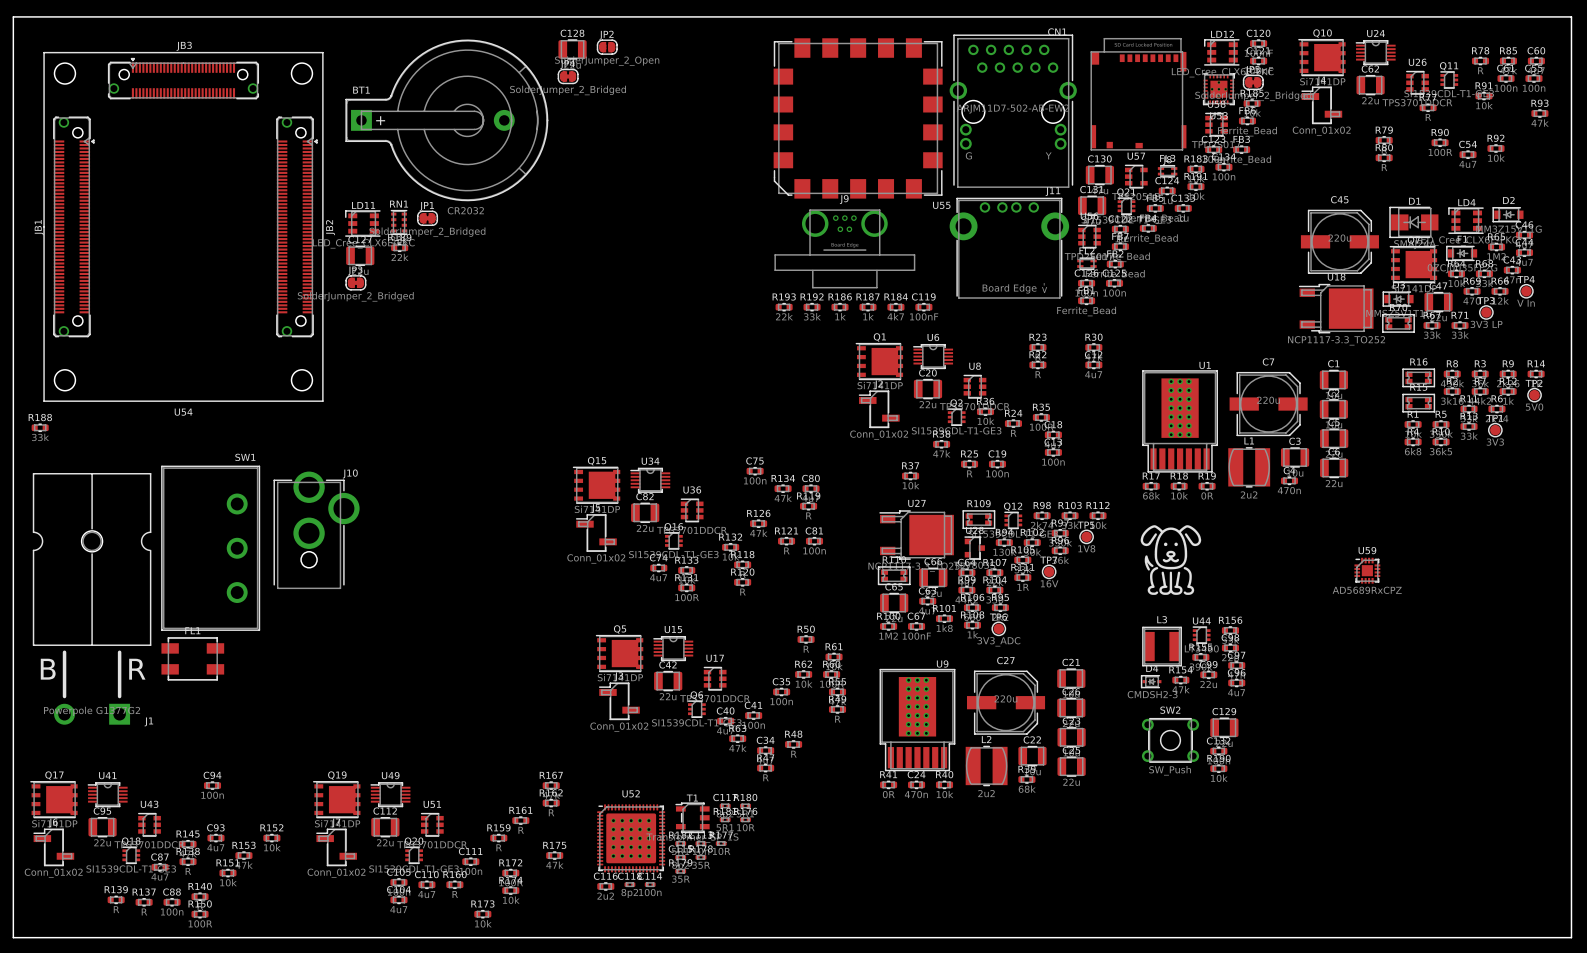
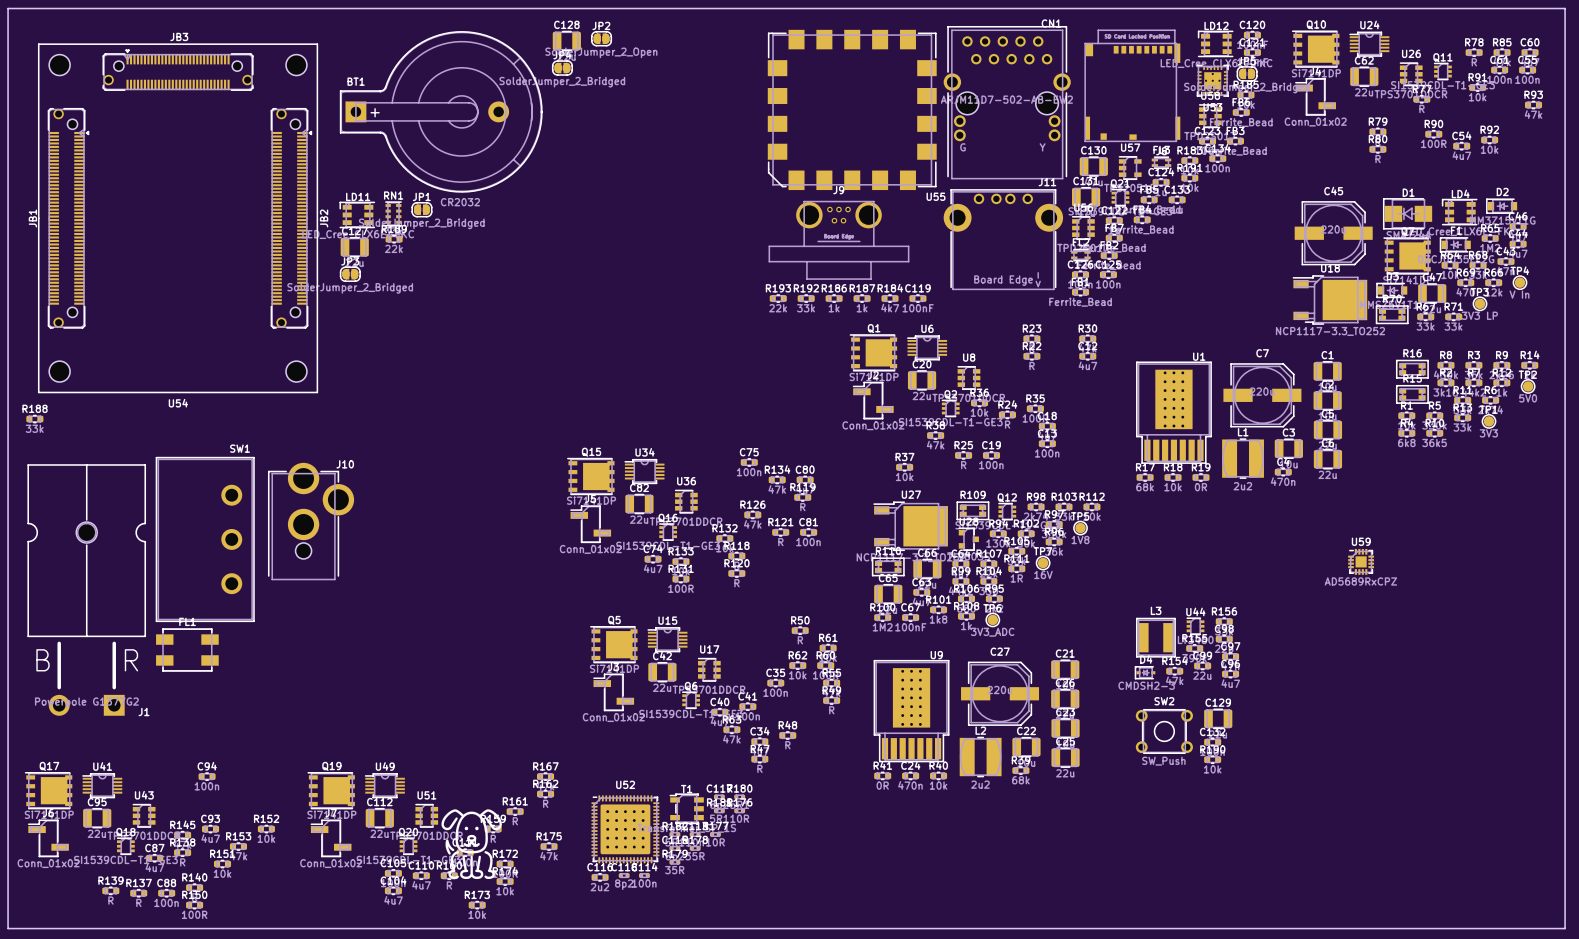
drawing: [1140, 525, 1202, 595] -> none
drawing: none -> [441, 809, 502, 880]

